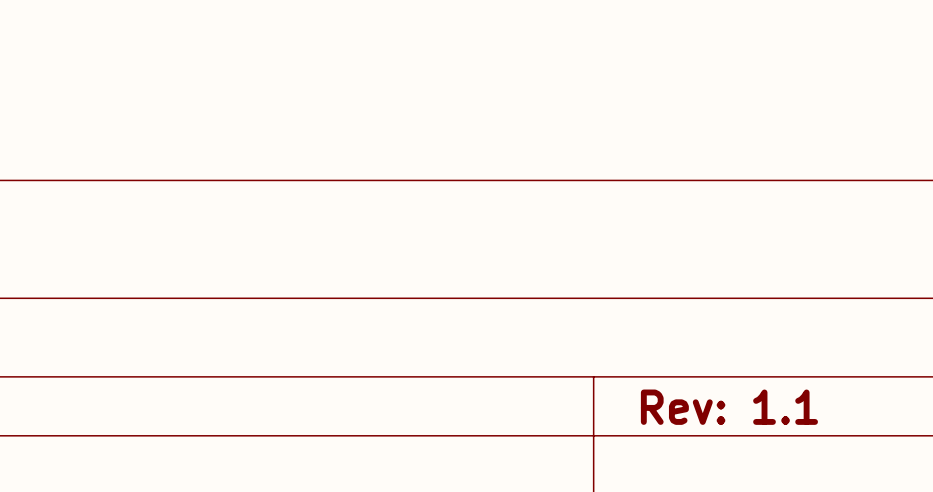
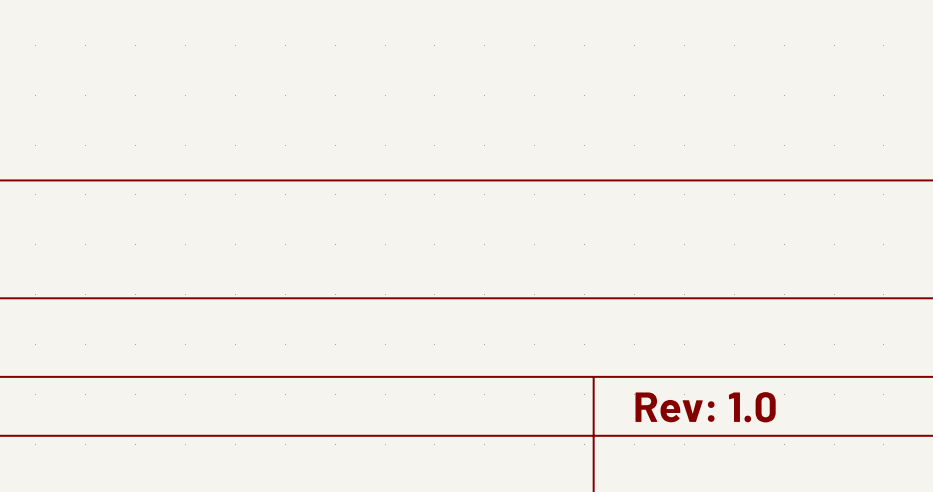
title block: Rev: 1.1 (729, 407) -> Rev: 1.0 (705, 407)

